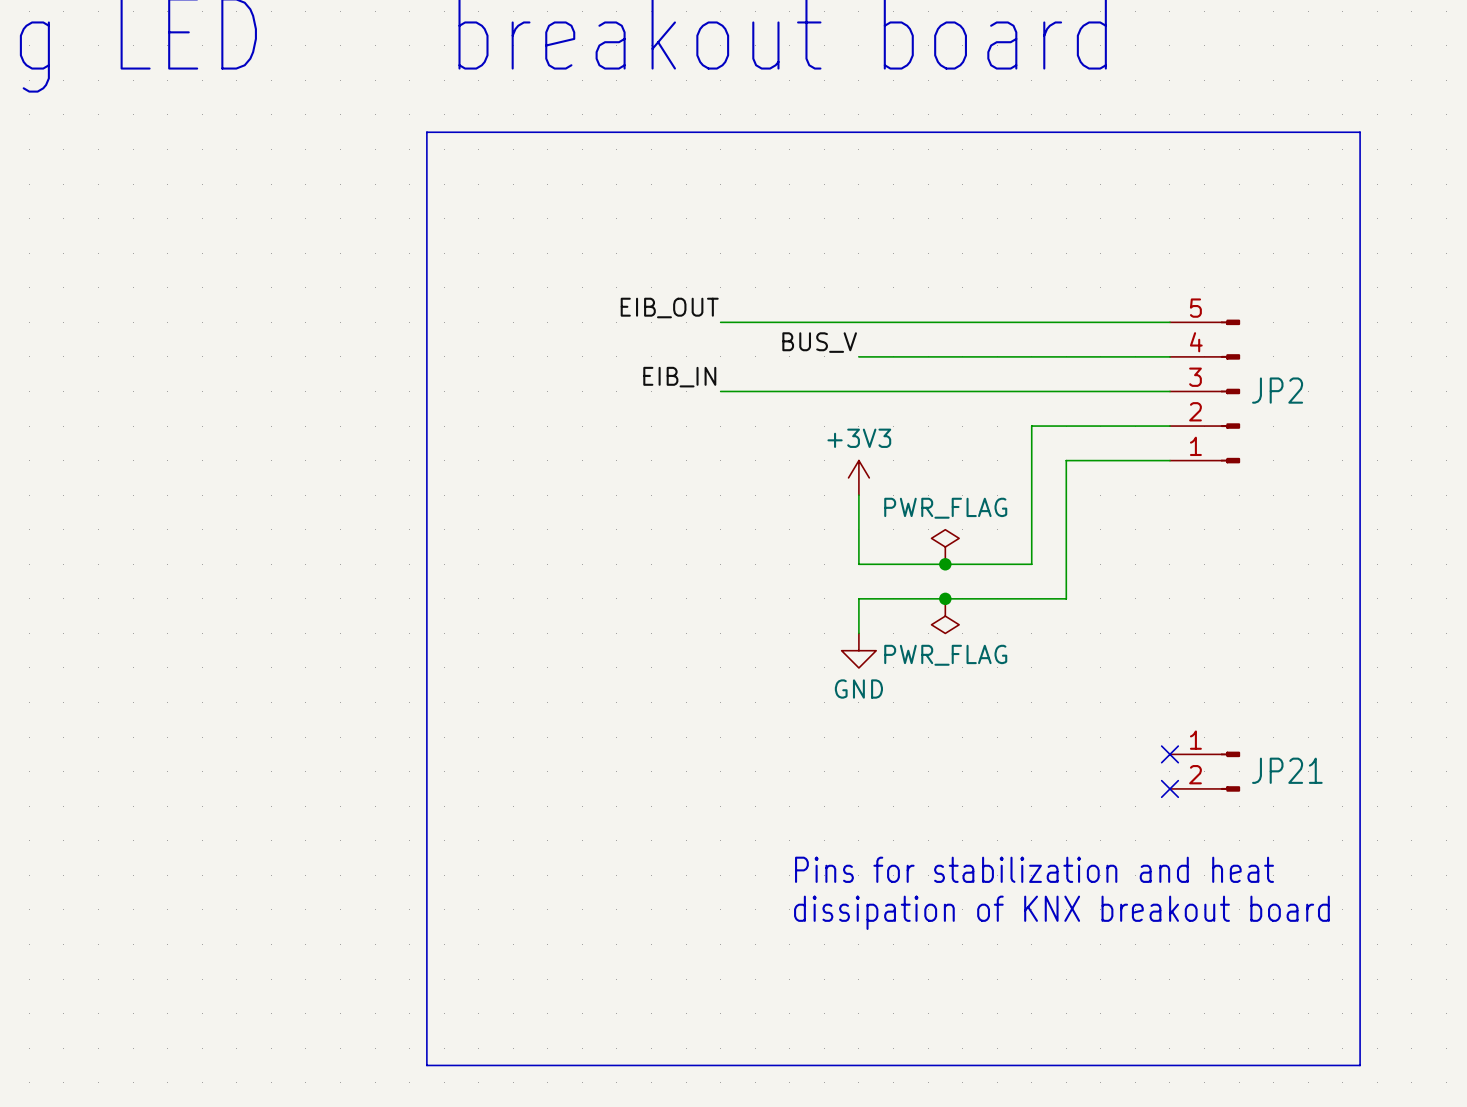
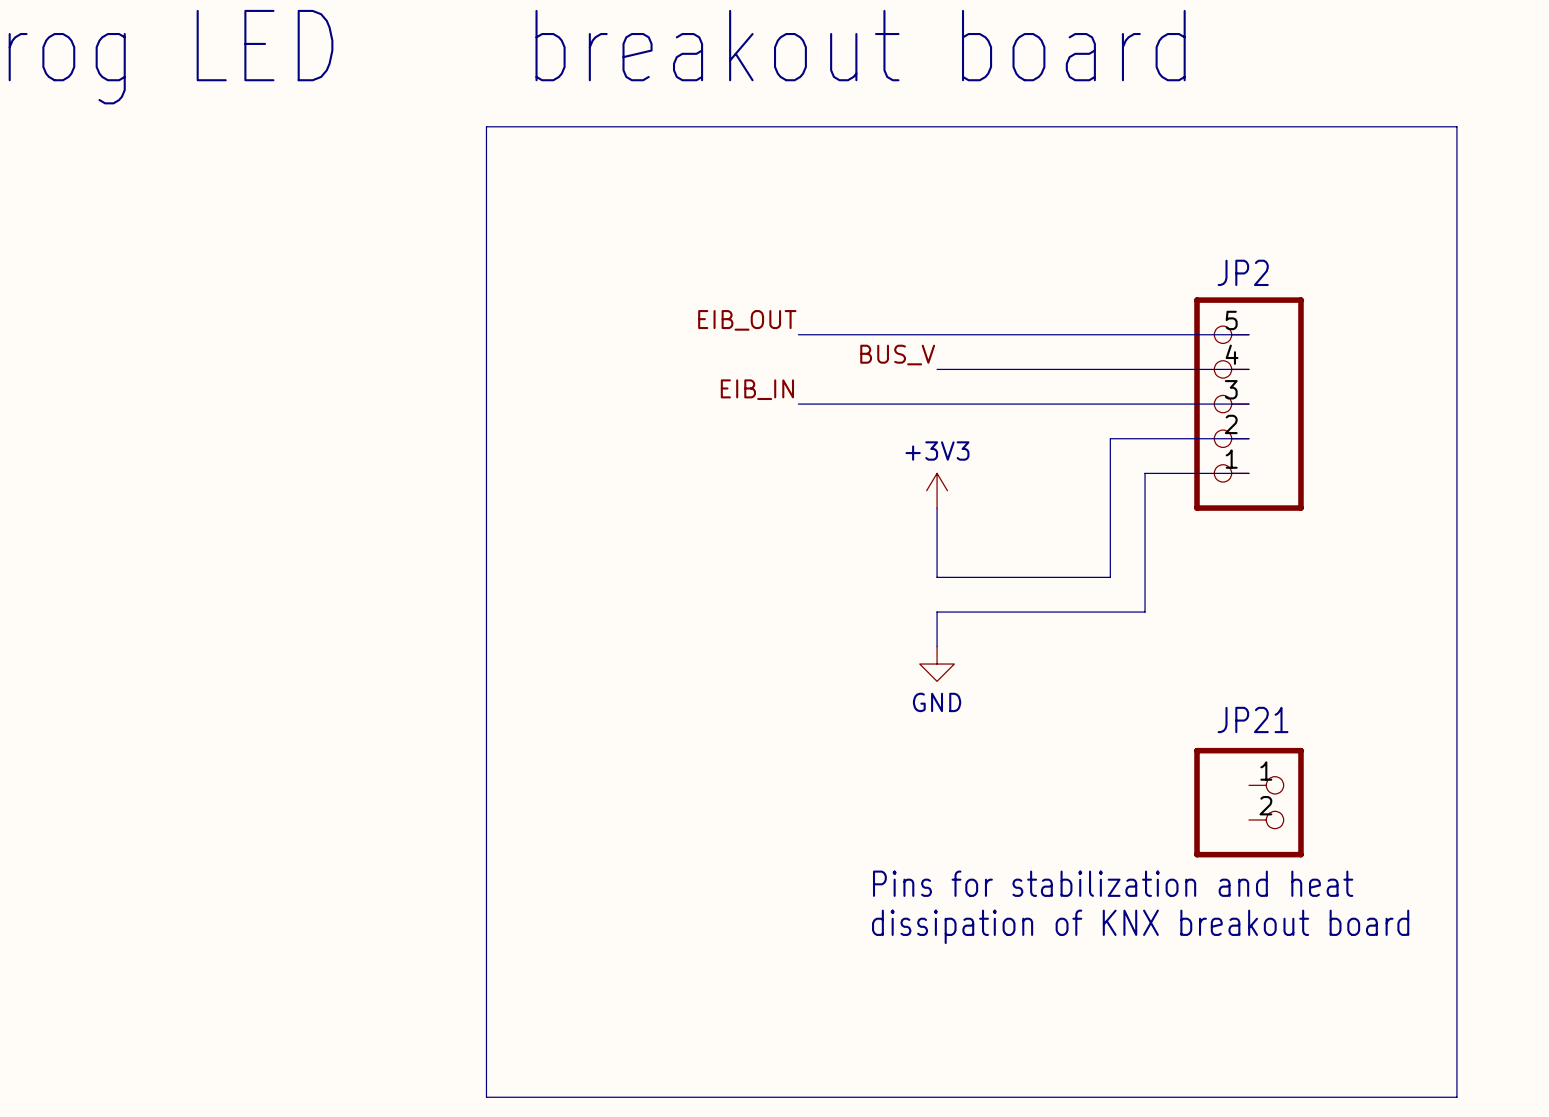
wire: none -> (486, 126) (1456, 126) (1456, 1097) (486, 1097) (486, 126)
line: (426, 132) (1360, 132) (1360, 1065) (426, 1065) (426, 132) -> none
JP2 symbol: [1169, 319, 1241, 464] -> [1194, 297, 1304, 511]
JP2 name position: JP2 (1277, 390) -> JP2 (1243, 272)
power symbol: PWR_FLAG (945, 547) -> none
junction: (945, 564) -> none
junction: (945, 598) -> none
power symbol: PWR_FLAG (945, 616) -> none
JP21 symbol: [1169, 751, 1241, 792] -> [1194, 747, 1304, 858]
no-connect mark: (1169, 754) -> none
JP21 name position: JP21 (1287, 770) -> JP21 (1253, 719)
no-connect mark: (1169, 788) -> none

